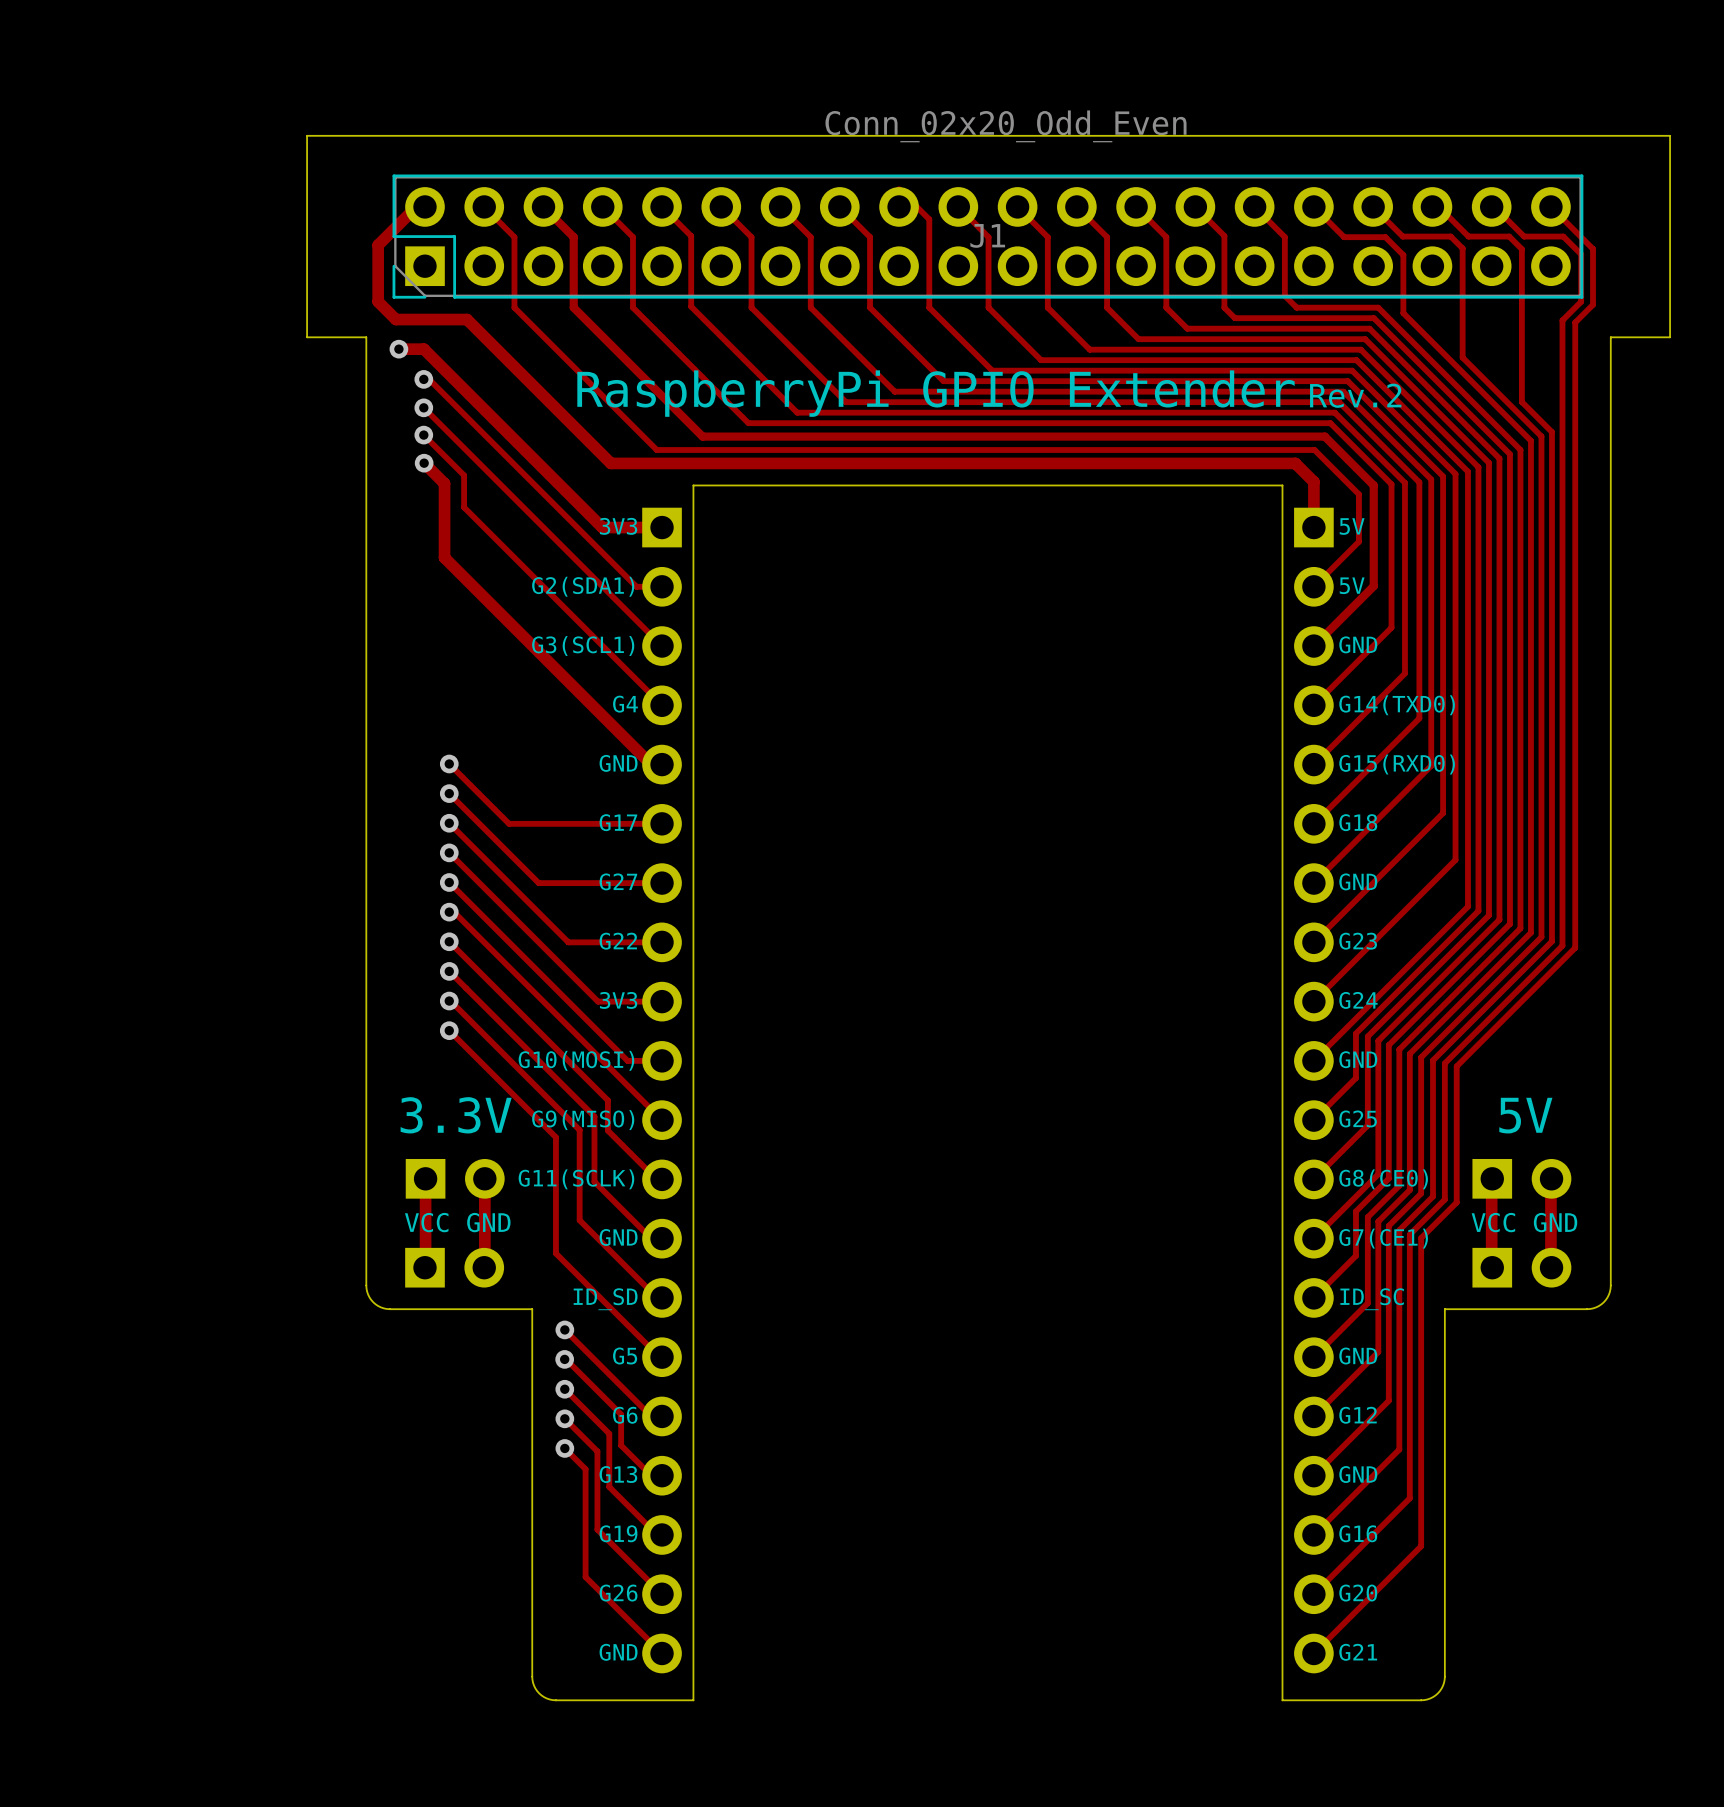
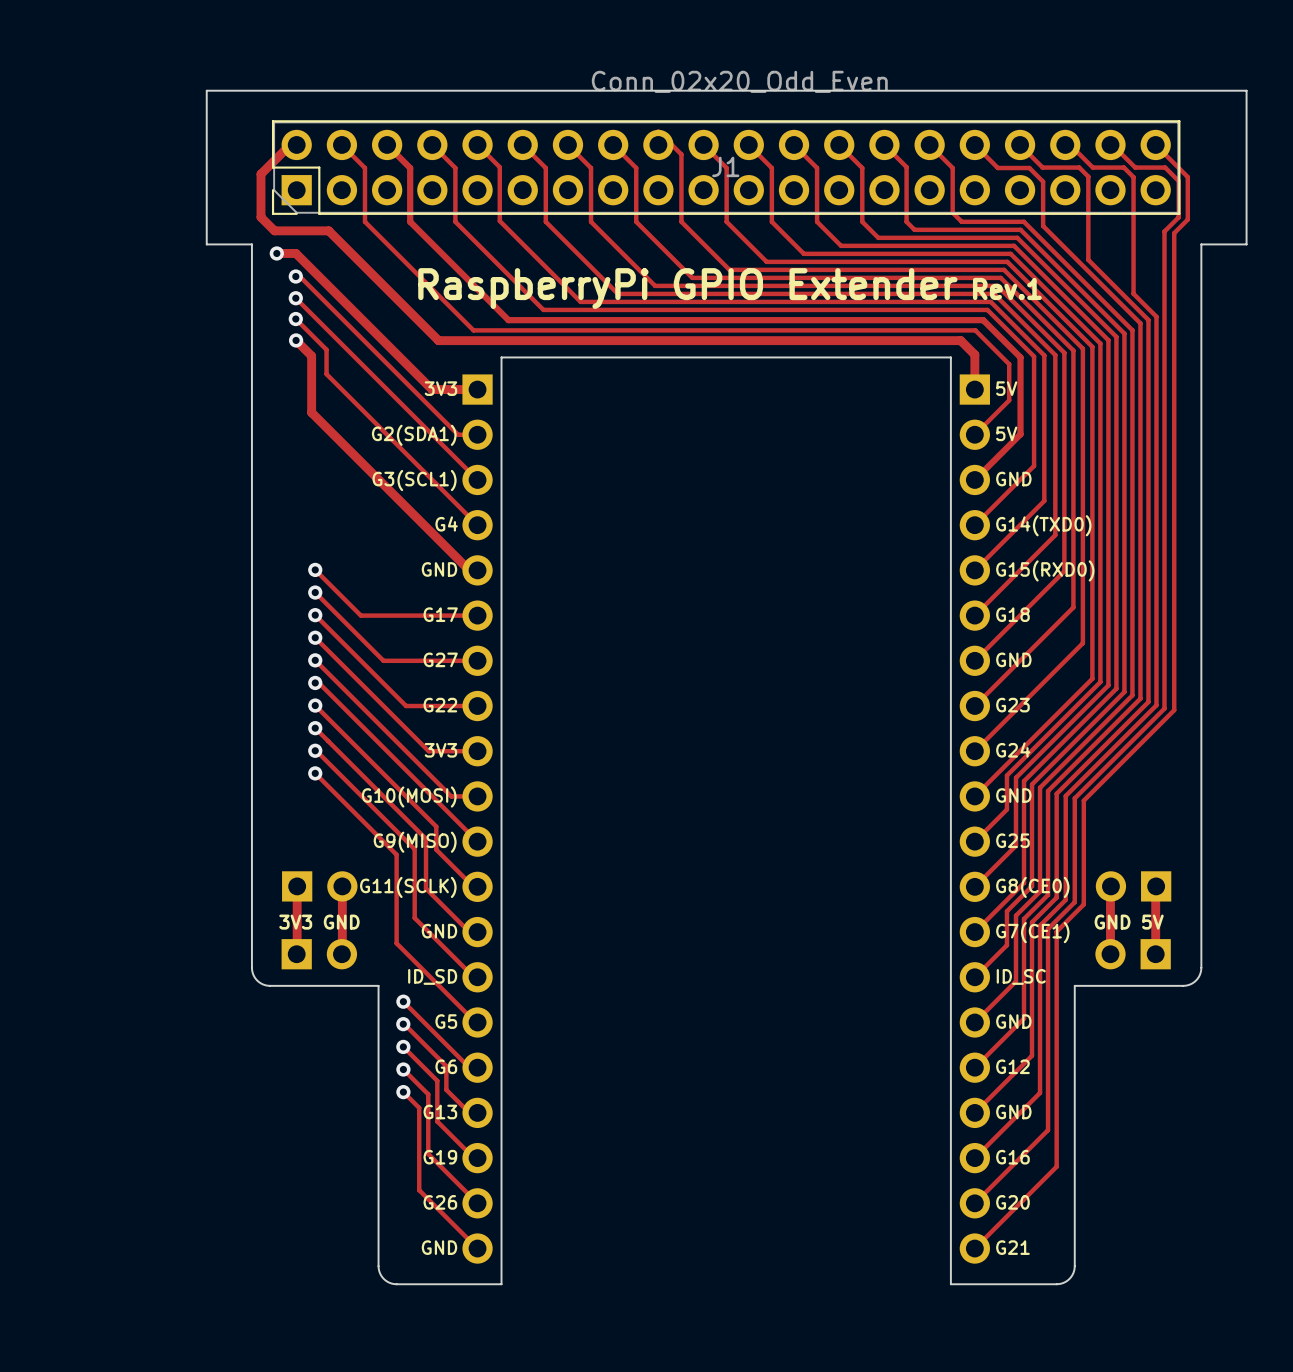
text: Rev.2 (1355, 395) -> Rev.1 (1007, 288)
text: 3.3V (456, 1115) -> none
text: 5V (1525, 1115) -> none
part rotation: 0° (1521, 1178) -> 180° (1133, 886)
text: VCC GND (457, 1222) -> 3V3 GND (319, 922)
text: VCC GND (1524, 1222) -> GND 5V (1129, 922)
part rotation: 0° (1521, 1267) -> 180° (1133, 954)

